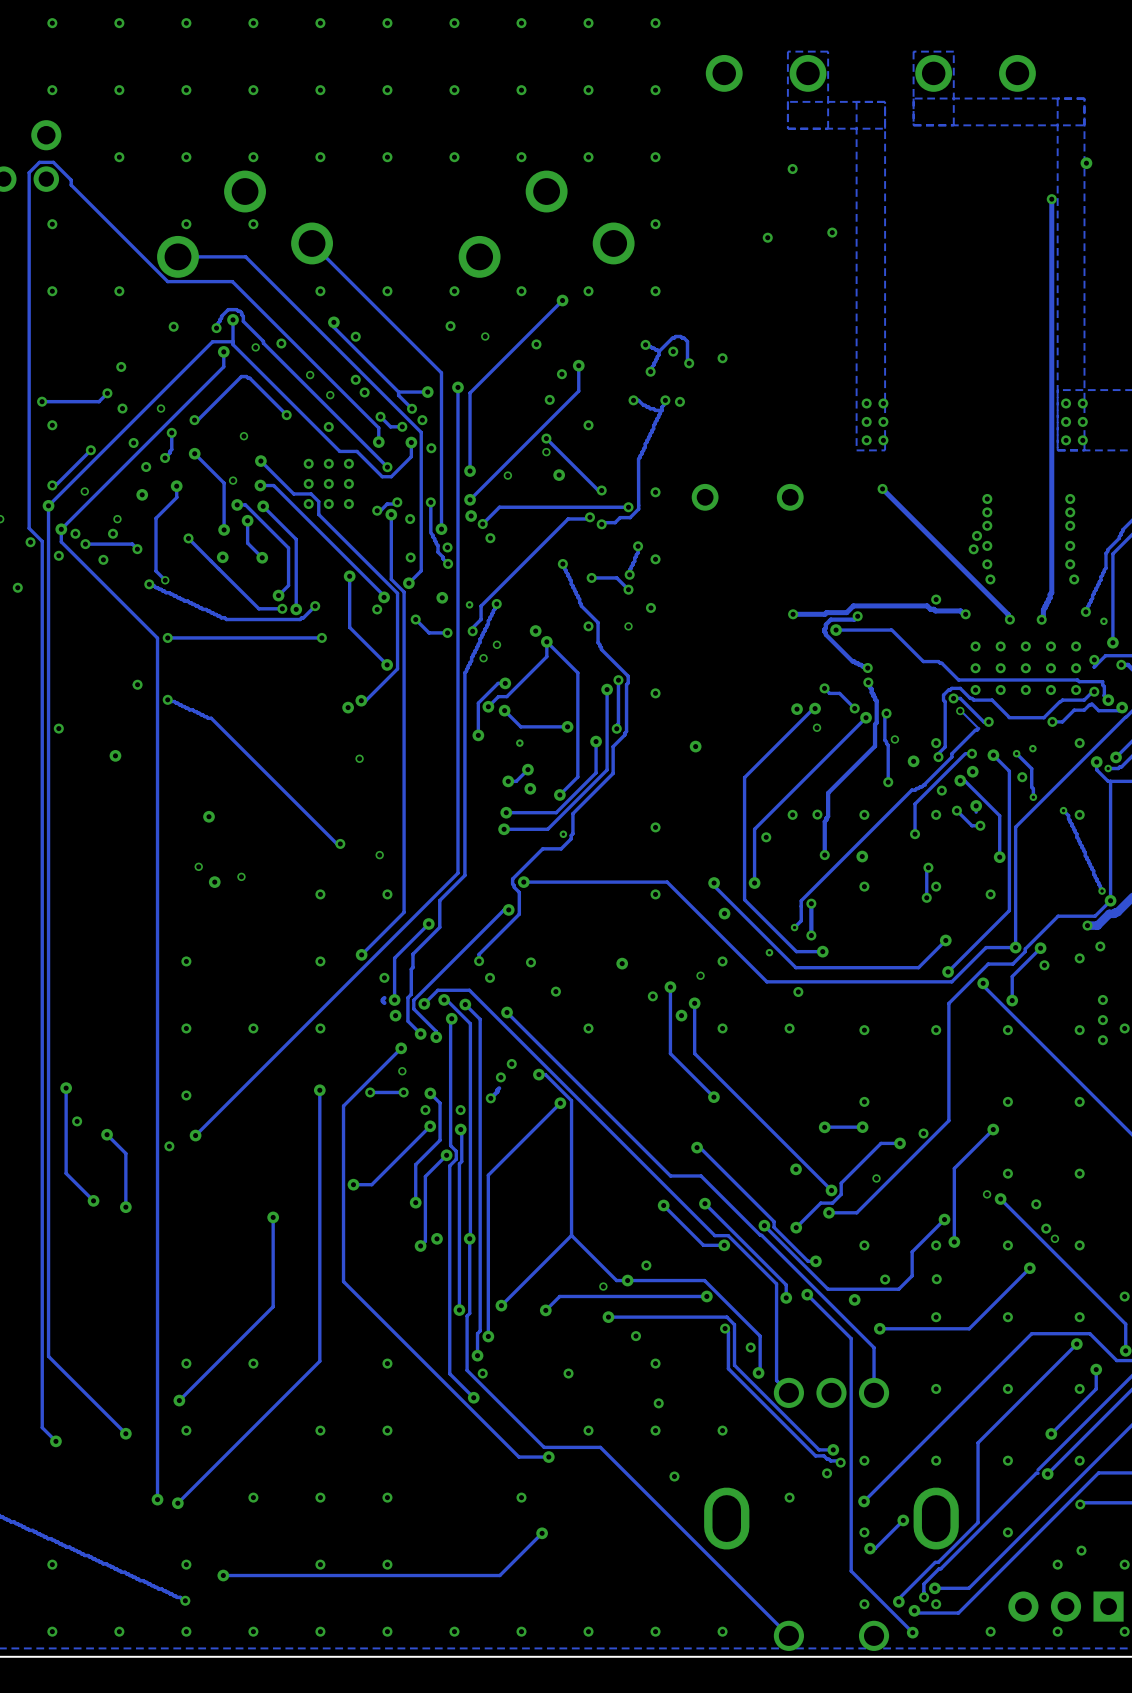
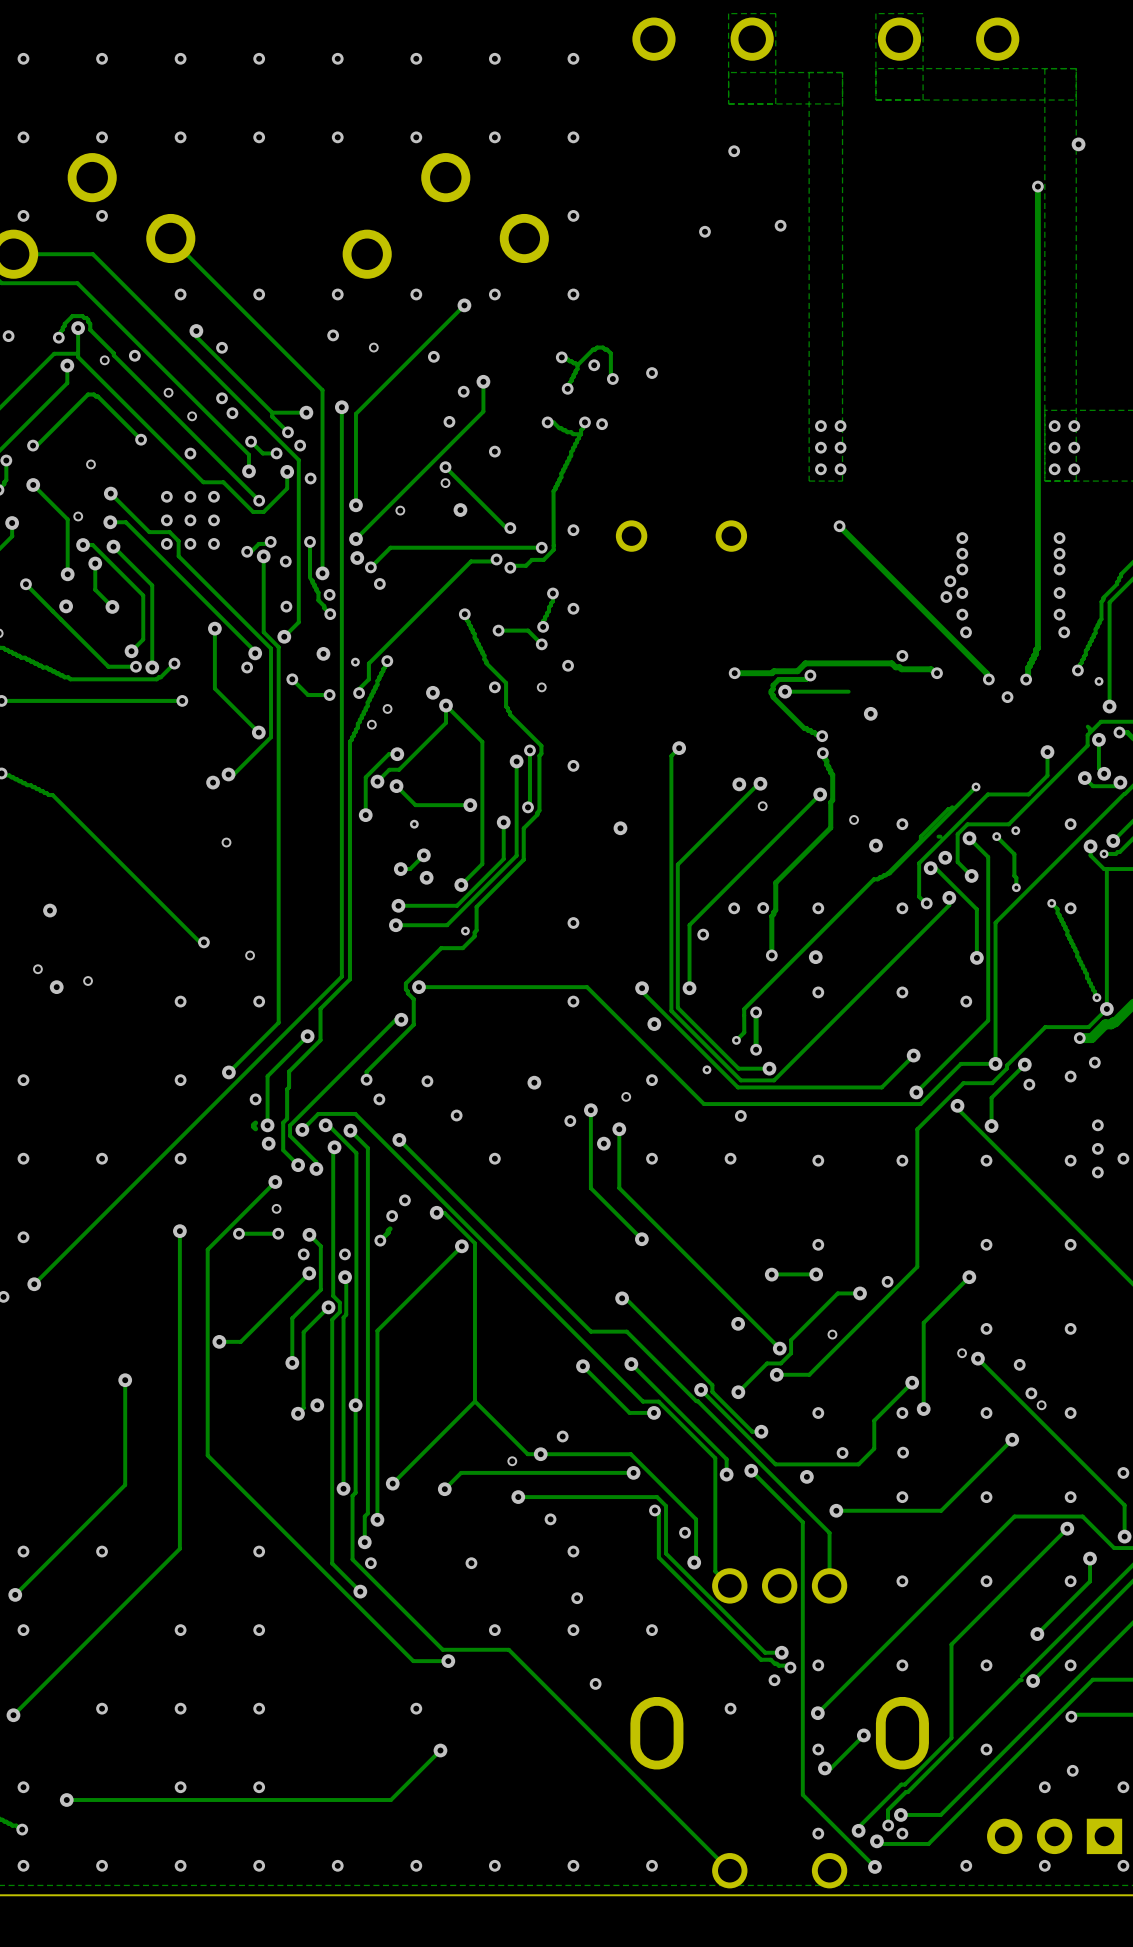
track: (891, 629) (923, 661) (941, 663) (958, 680) (1102, 681) (1104, 695) -> none
via: none -> (1007, 697)
via: none -> (870, 713)
via: (1094, 659) -> none
track: none -> (1087, 735) (1087, 745) (1008, 824) (967, 824) (957, 834) (957, 861) (971, 875)
part: (1025, 668) -> none
track: none -> (1098, 739) (1098, 768)
via: none -> (1098, 739)
track: none -> (679, 748) (671, 755) (671, 1010) (740, 1080) (774, 1080) (949, 905)
via: none -> (679, 748)
track: none -> (1047, 752) (1047, 775)
via: none -> (1047, 752)
track: (824, 688) (829, 693) (839, 693) (854, 708) -> none
via: (824, 688) -> none
track: (1094, 691) (1084, 700) (1062, 700) (1060, 701) -> none
via: (1094, 691) -> none
track: (953, 698) (960, 698) (983, 721) (988, 721) -> none
via: (953, 698) -> none
via: none -> (1084, 778)
track: (1090, 705) (1084, 710) (1074, 710) (1062, 721) (1052, 721) -> none
via: (854, 708) -> none
track: (960, 710) (977, 727) -> none
via: (960, 710) -> none
track: none -> (976, 787) (889, 873)
via: none -> (976, 787)
track: (886, 713) (884, 715) (884, 740) (888, 745) (888, 782) -> none
via: (886, 713) -> none
track: (1008, 716) (992, 700) (973, 700) (960, 688) (948, 690) (943, 695) (945, 747) (938, 753) (938, 757) -> none
track: none -> (987, 794) (919, 863) (919, 896) (925, 903)
via: (988, 721) -> none
via: (1052, 721) -> none
track: (965, 753) (915, 803) (915, 834) -> none
via: (972, 753) -> none
via: (938, 757) -> none
via: (1022, 777) -> none
via: (888, 782) -> none
via: none -> (971, 875)
via: (941, 790) -> none
track: (956, 810) (972, 825) (980, 825) -> none
via: (980, 825) -> none
via: (915, 834) -> none
track: (928, 867) (926, 869) (926, 897) -> none
via: (928, 867) -> none
via: (926, 897) -> none

